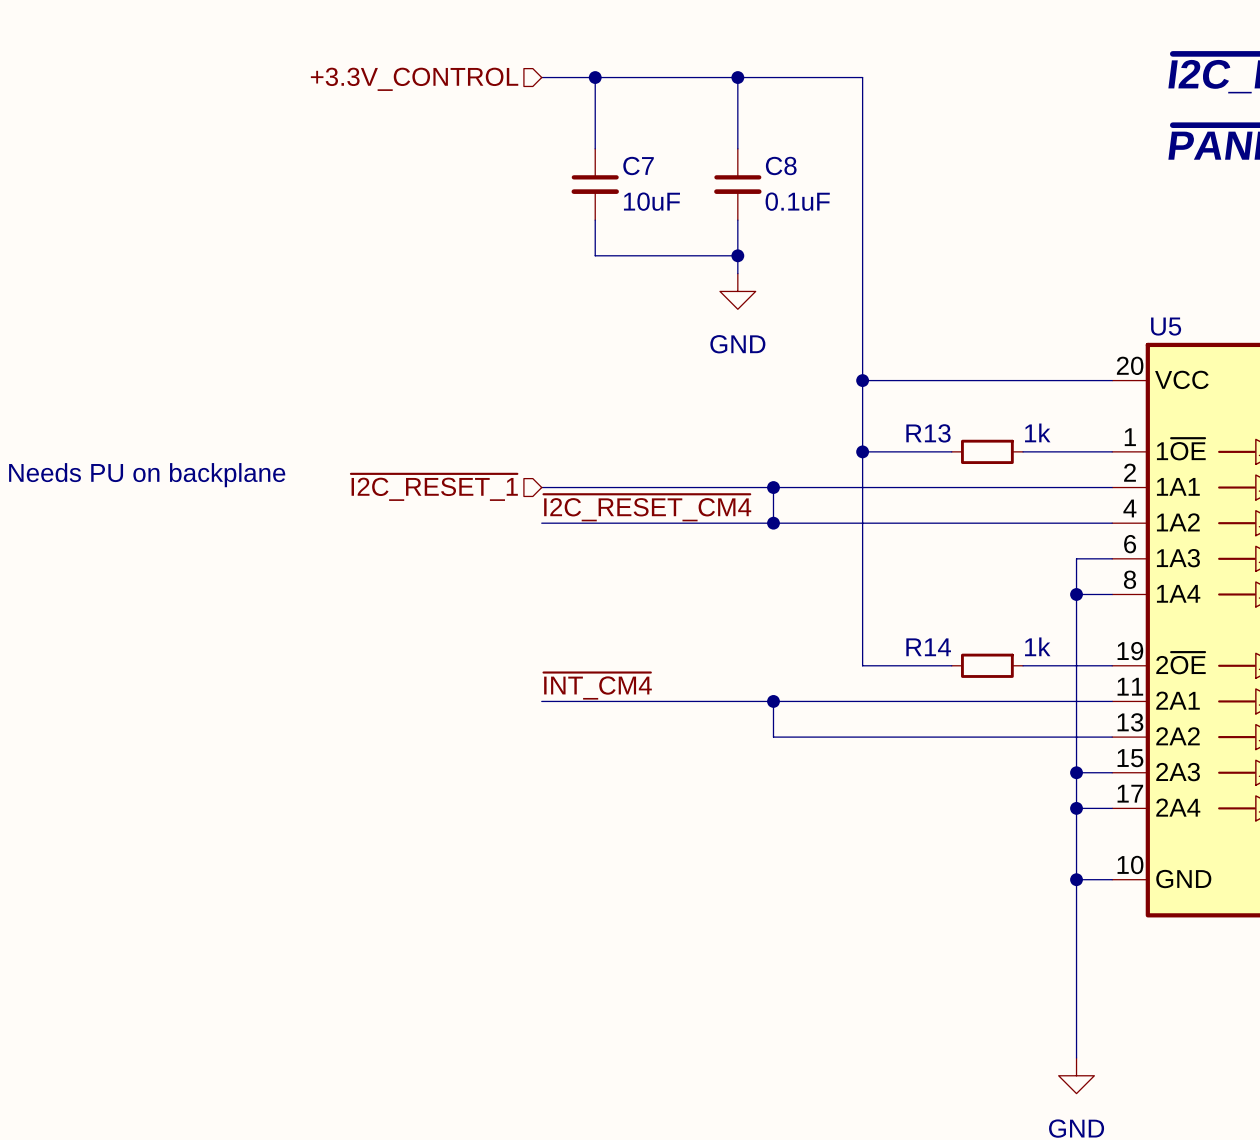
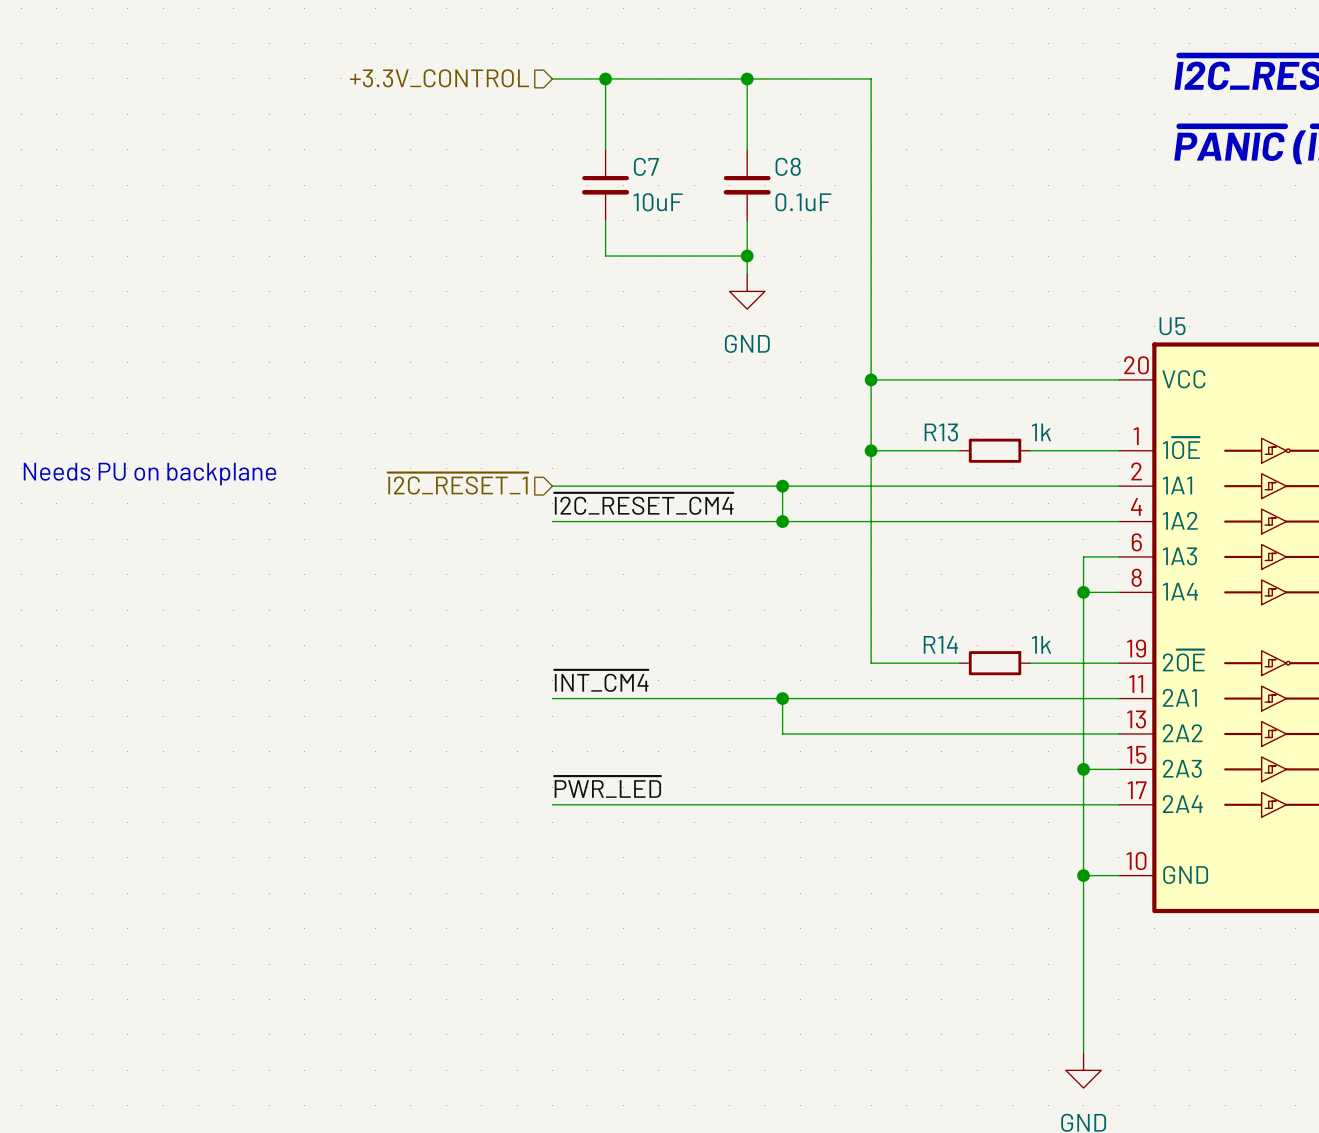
label: none -> ~{PWR_LED} (607, 786)
wire: none -> (552, 804) (1083, 804)
junction: (1076, 808) -> none

